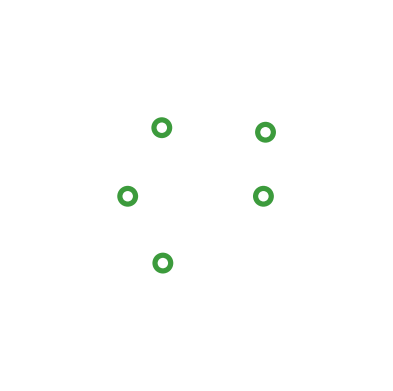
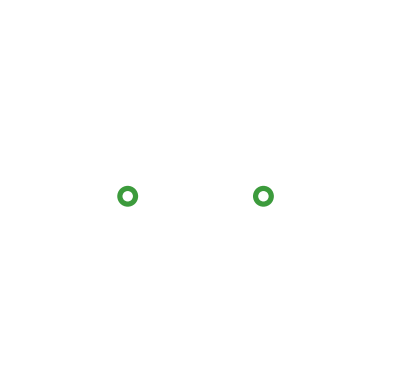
via: (161, 127) -> none
via: (265, 132) -> none
via: (162, 263) -> none

